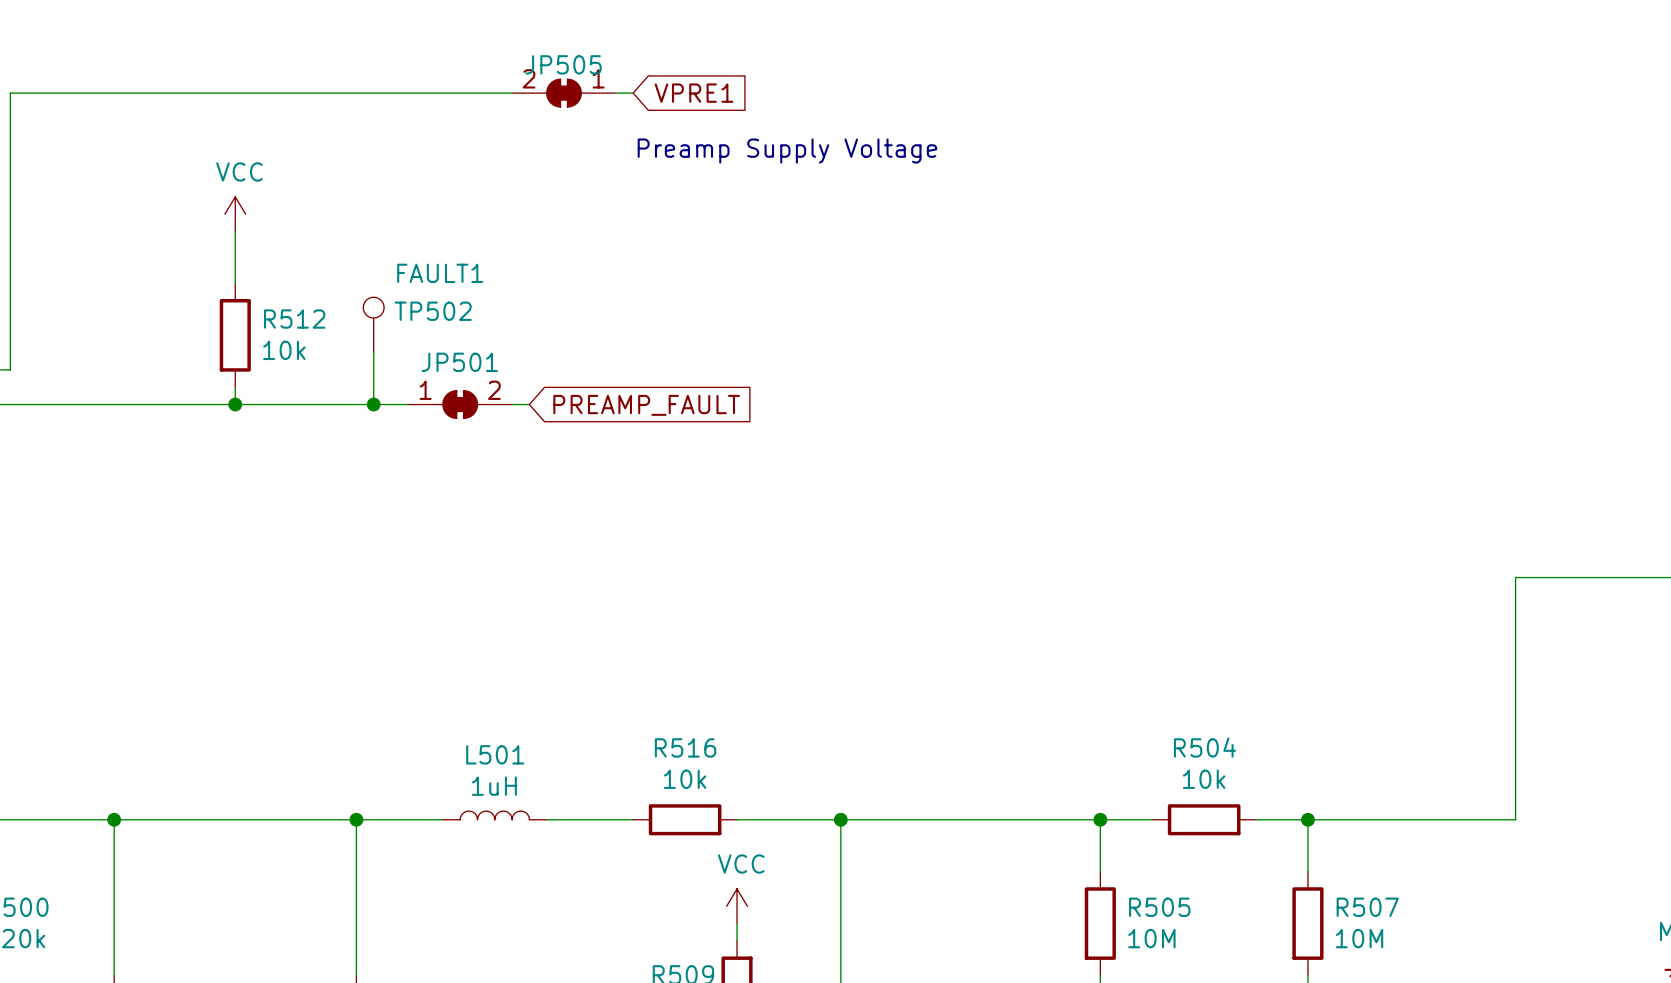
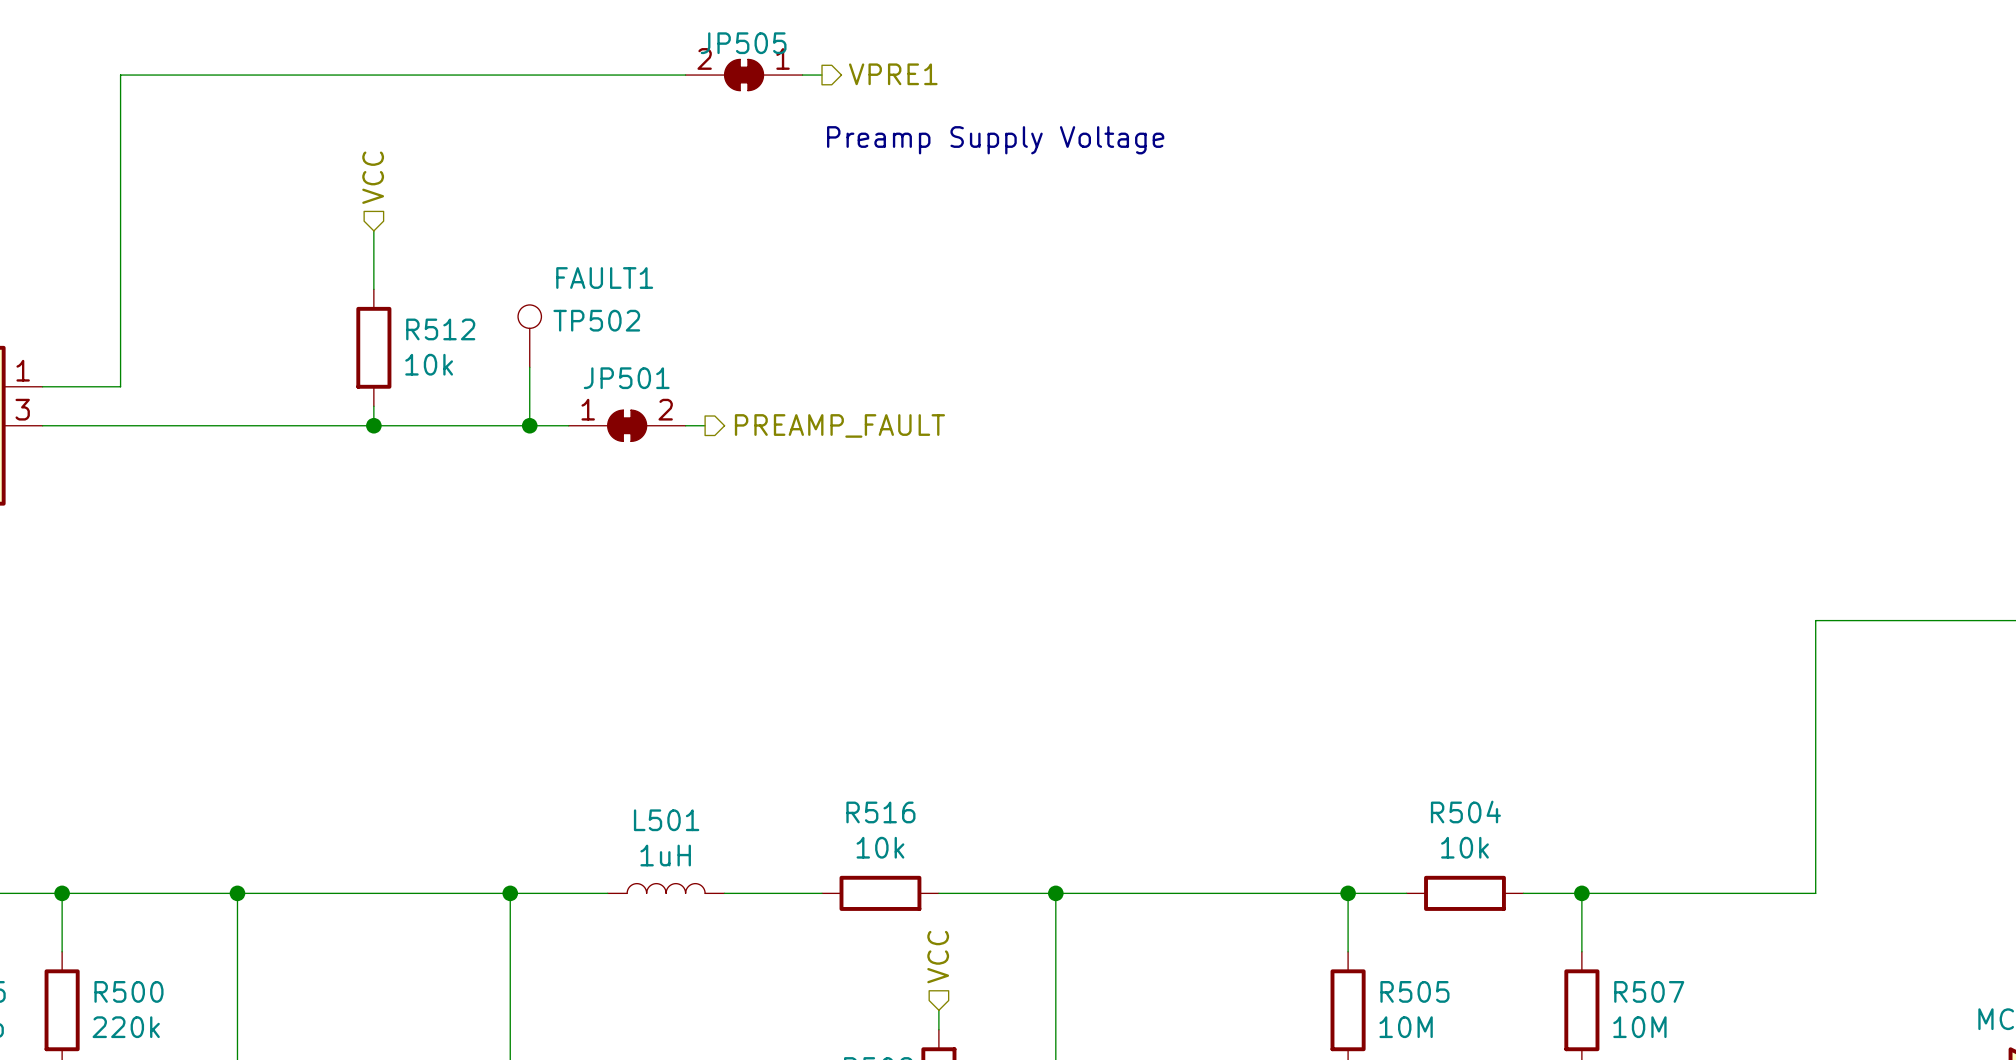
hierarchical label: none -> VPRE1 (893, 74)
global label: VPRE1 (694, 93) -> none
hierarchical label: none -> VCC (373, 177)
power symbol: VCC (235, 214) -> none
hierarchical label: none -> PREAMP_FAULT (839, 425)
global label: PREAMP_FAULT (646, 405) -> none
hierarchical label: none -> VCC (938, 957)
power symbol: VCC (737, 906) -> none

